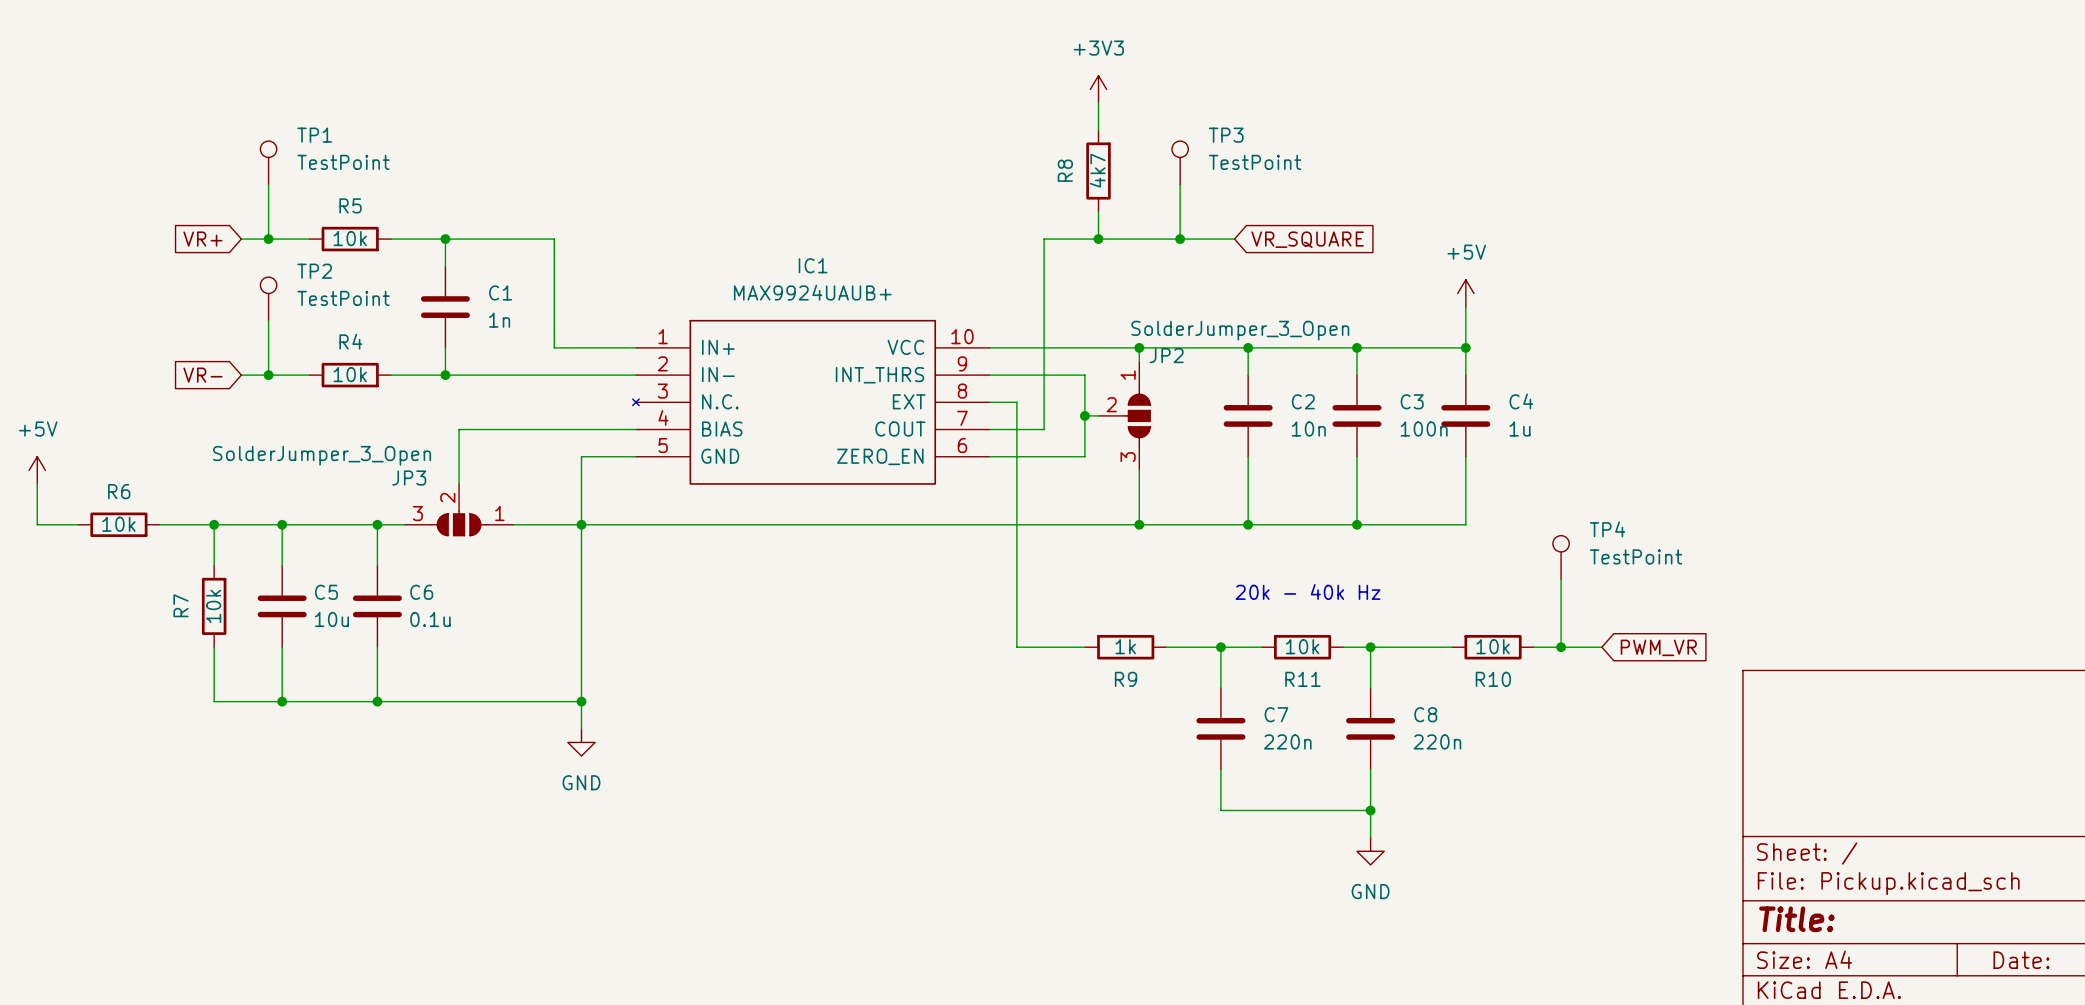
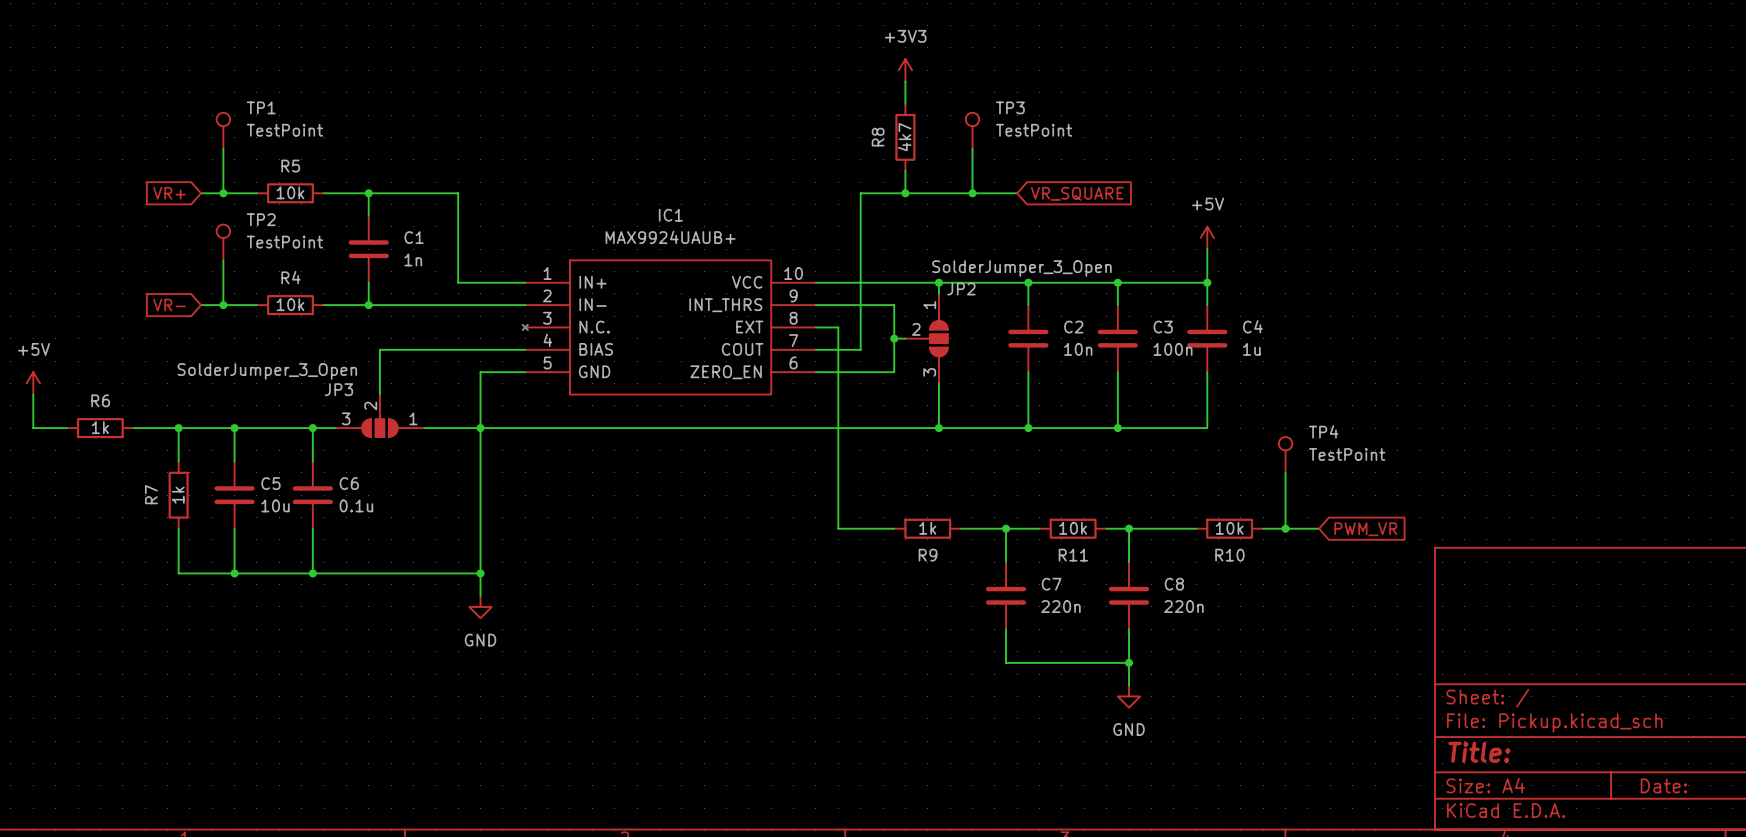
R6 value: 10k (118, 524) -> 1k (100, 427)
text: 20k - 40k Hz (1308, 592) -> none
R7 value: 10k (213, 606) -> 1k (178, 495)

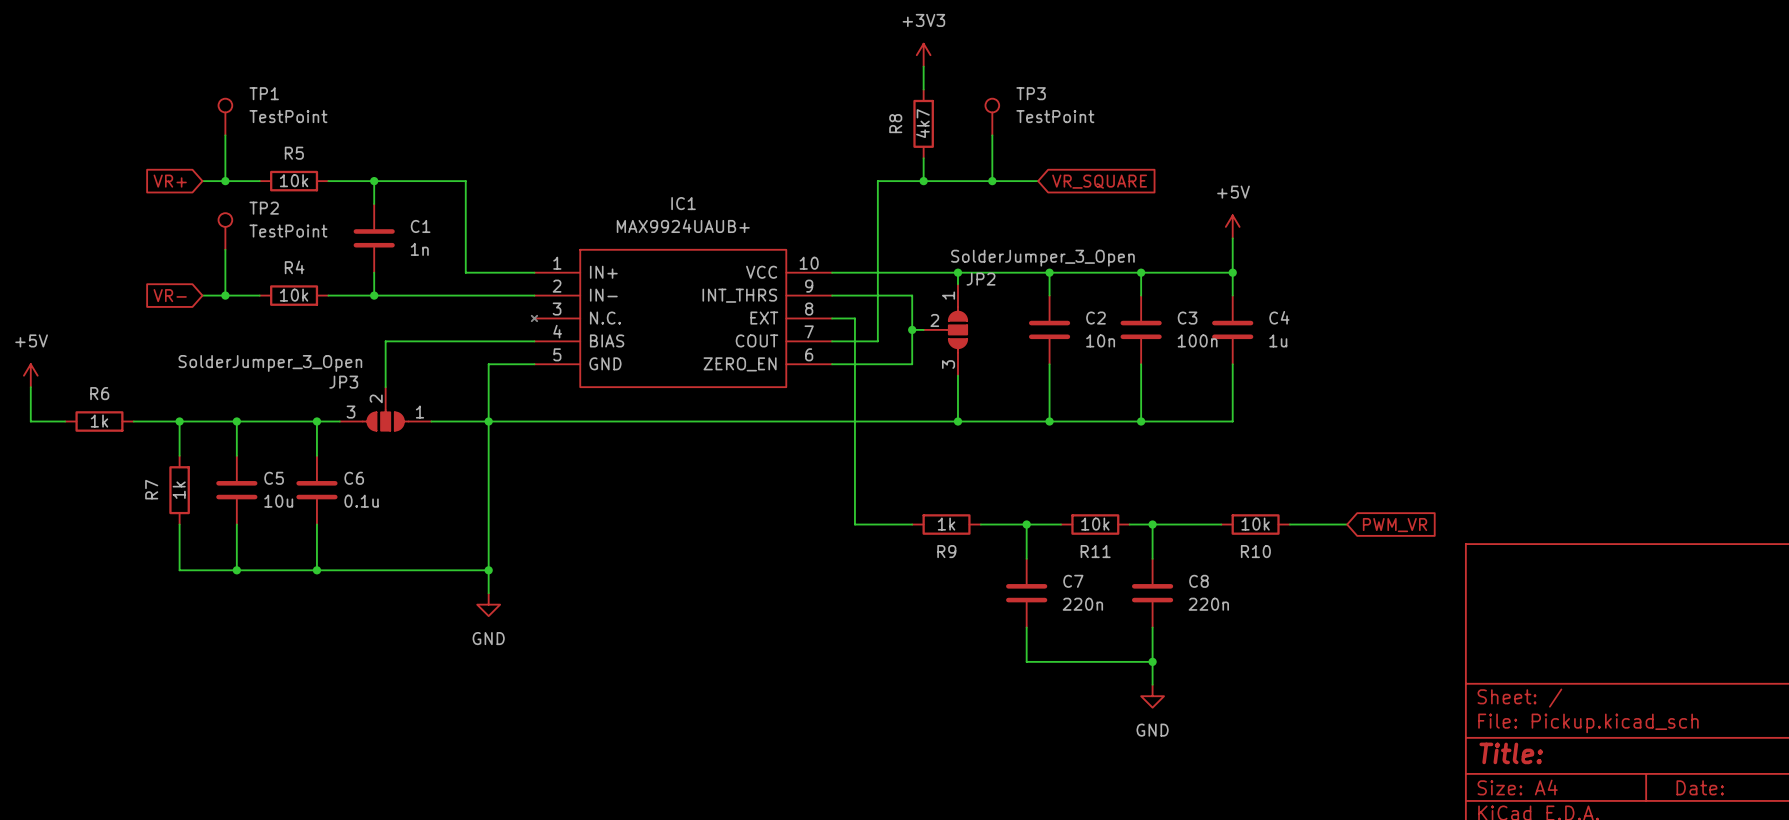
TP4: TestPoint (1285, 454) -> none
wire: (1285, 472) (1285, 528) -> none
junction: (1285, 528) -> none

